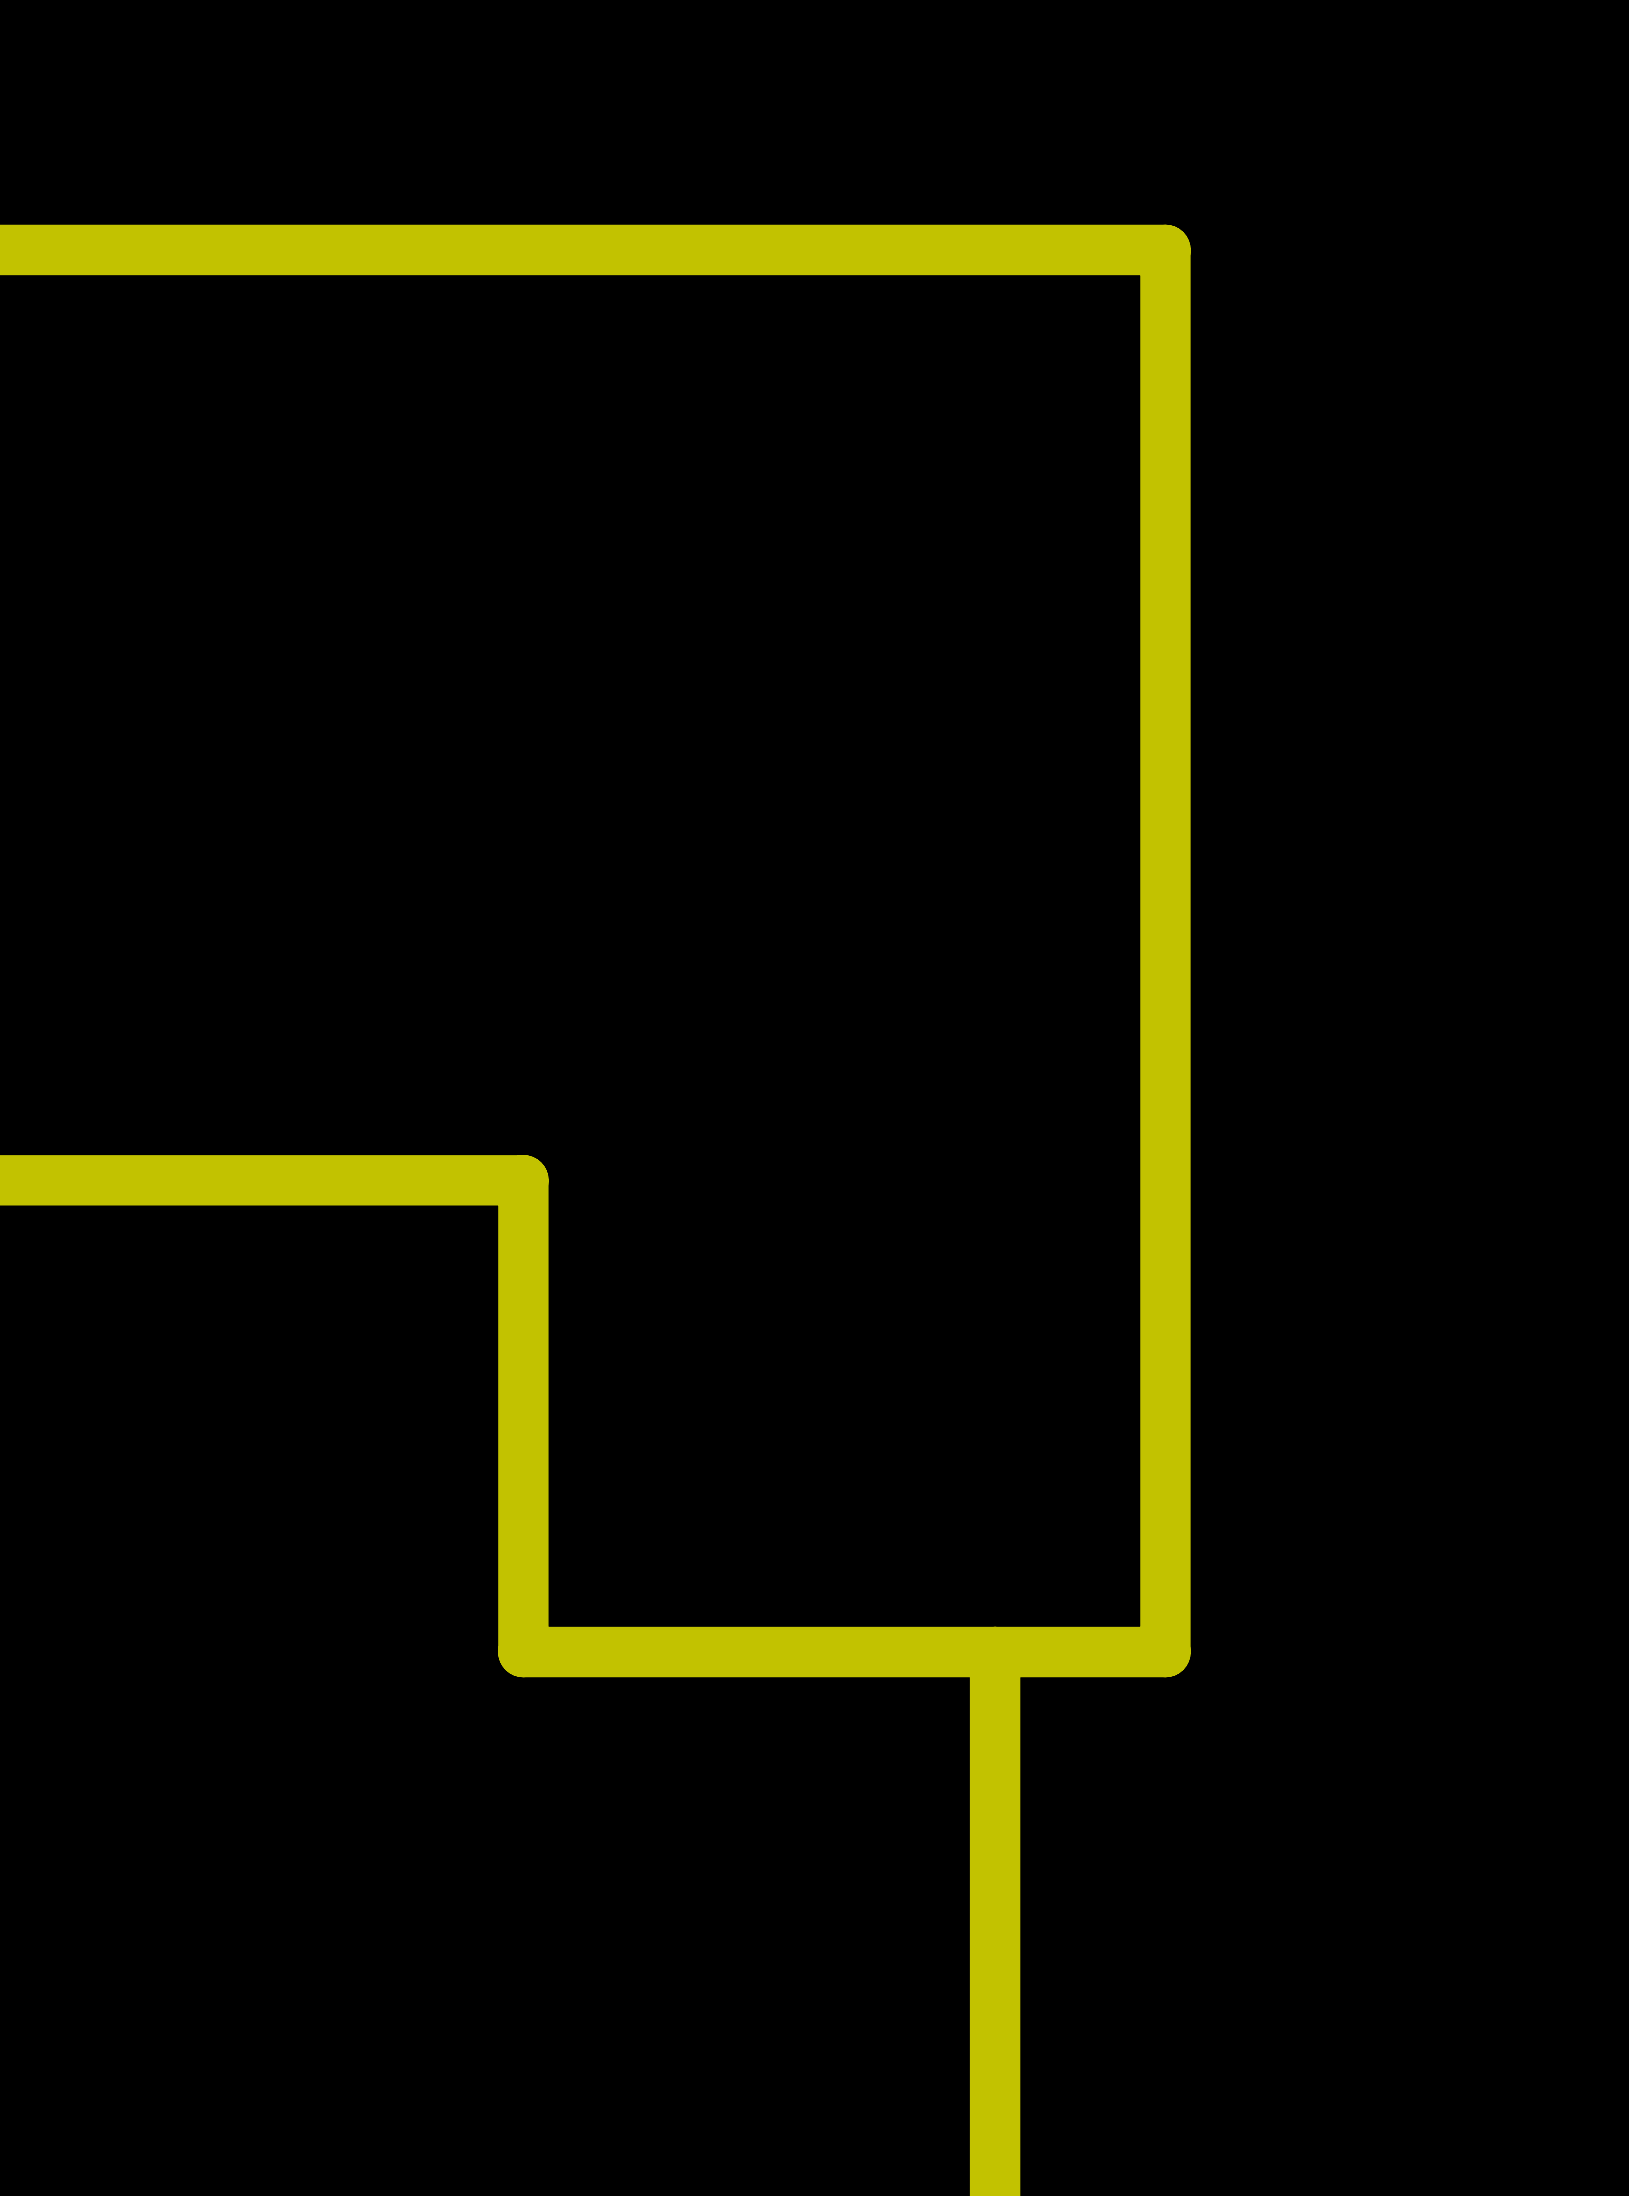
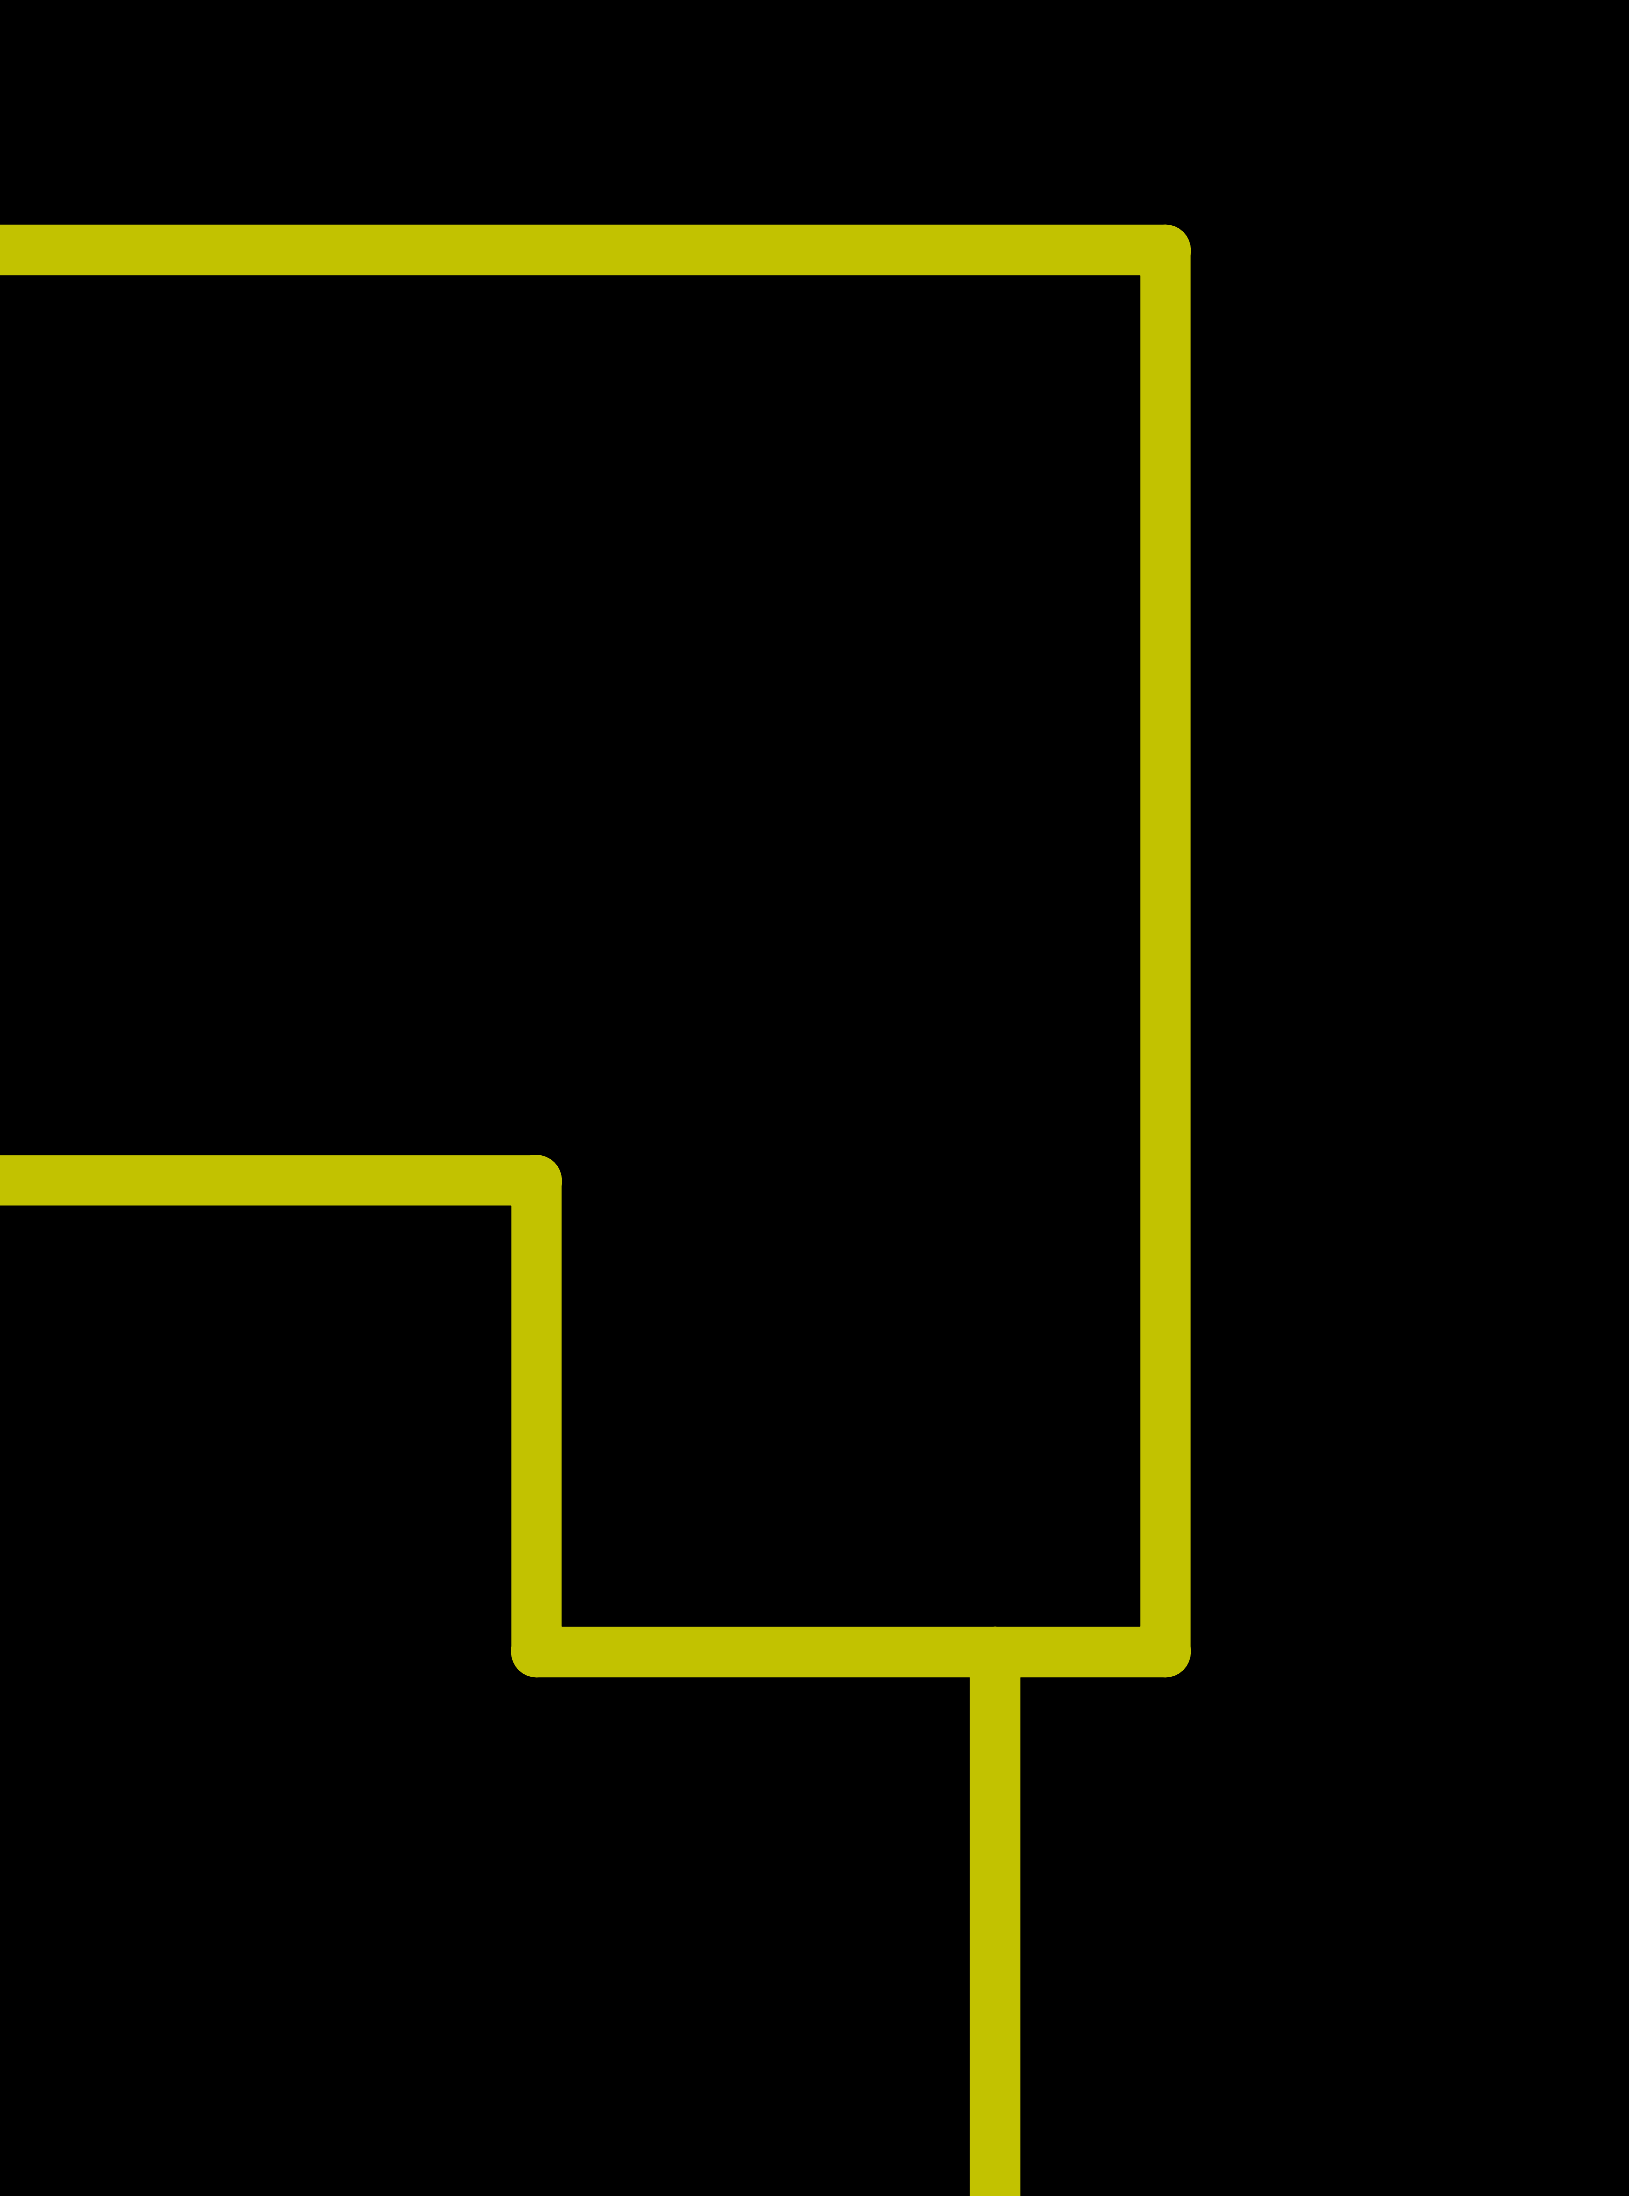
board edge: (523, 1180) (523, 1652) (536, 1652) -> (523, 1180) (536, 1180) (536, 1652)

